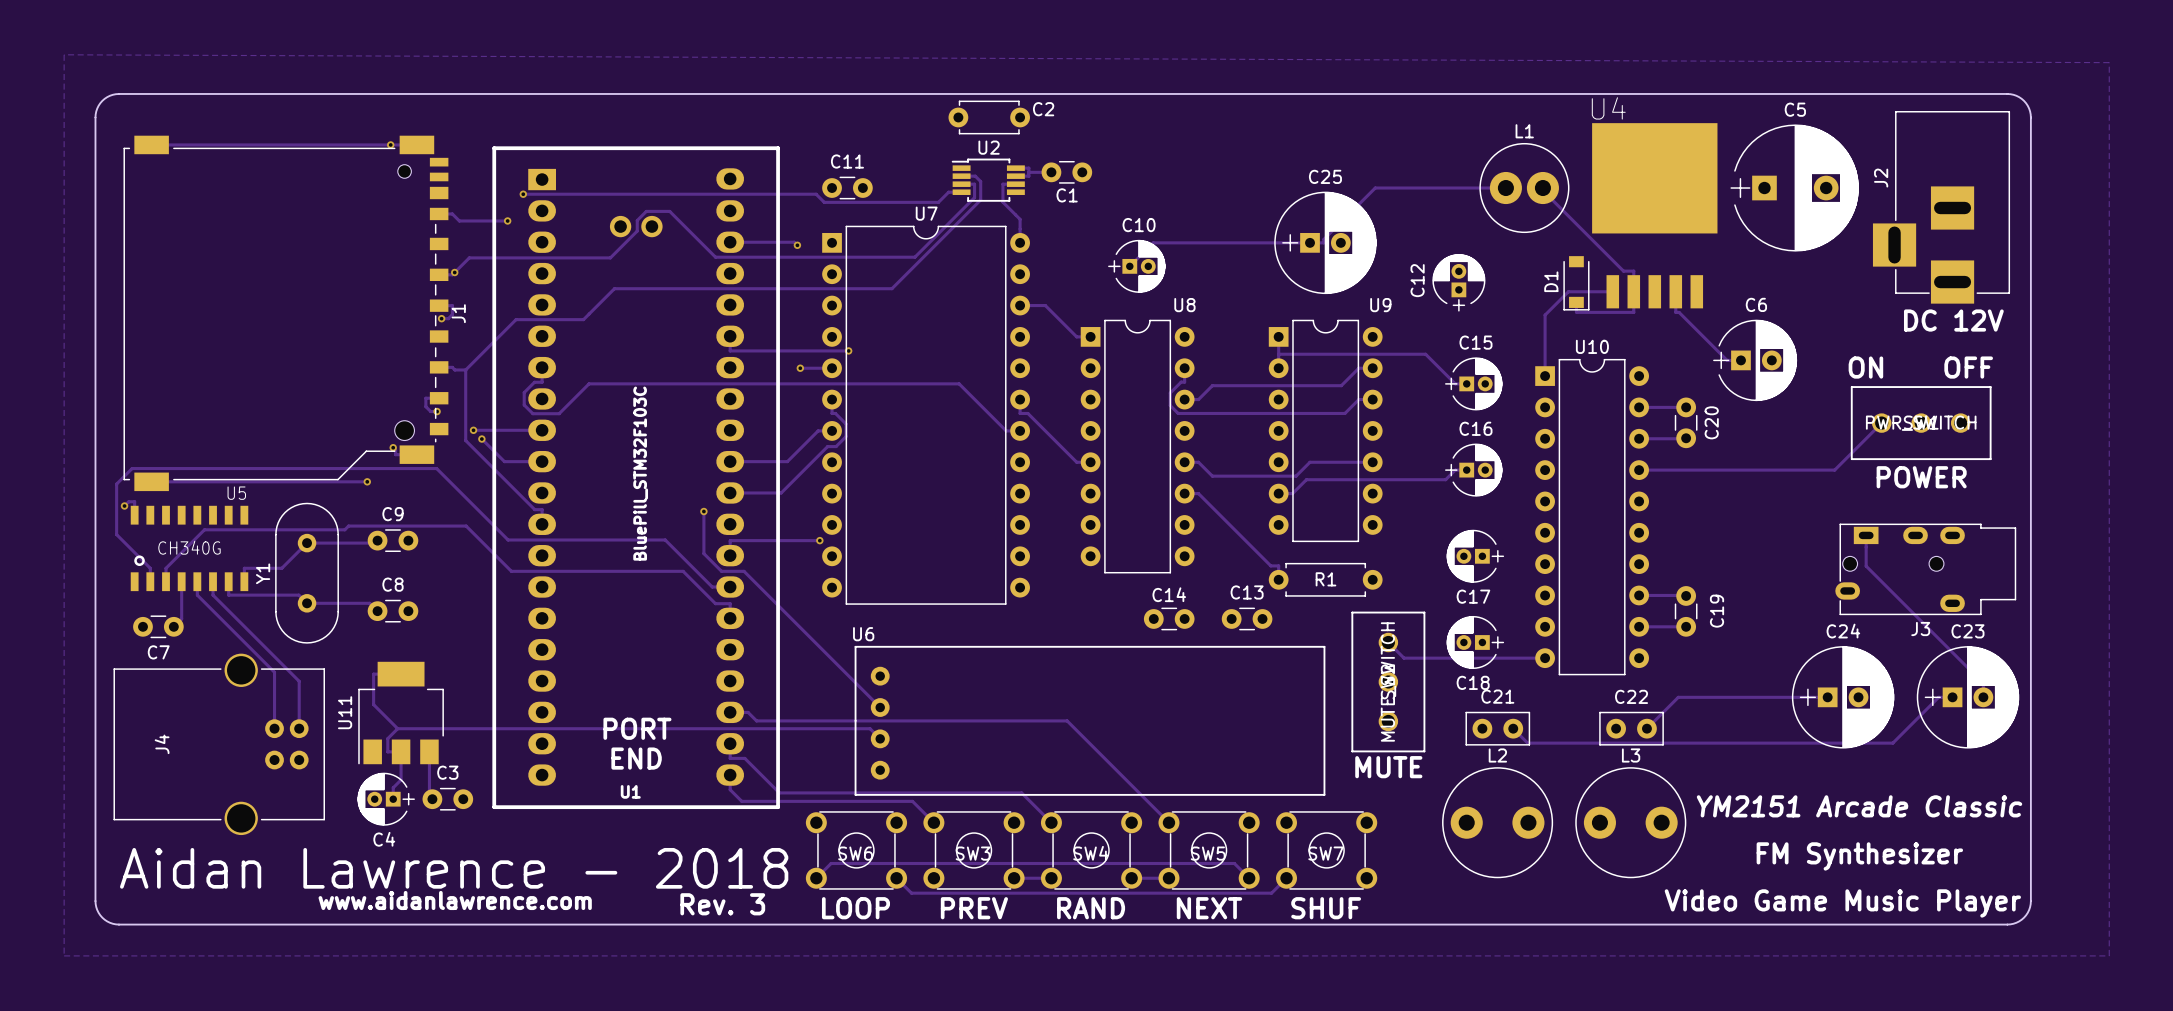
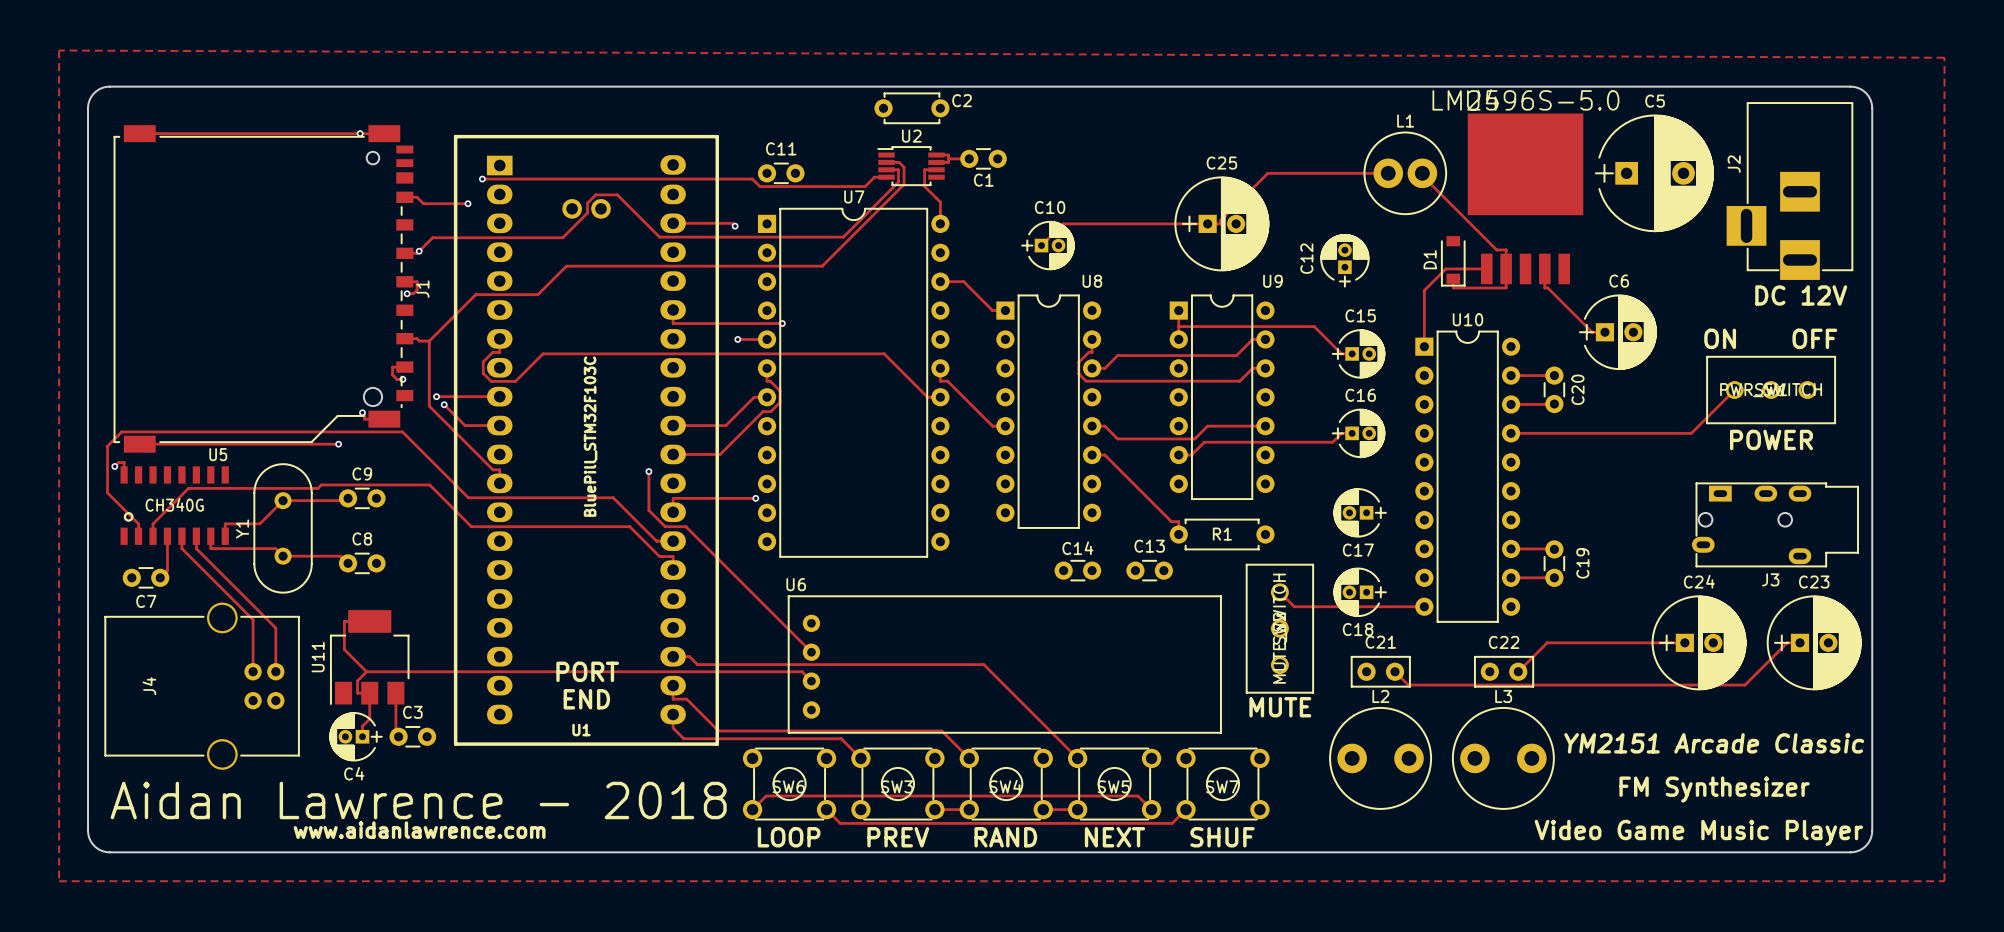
U4 value: none -> LM2596S-5.0 (1525, 100)
track: (1866, 535) (1866, 566) (1983, 683) (1983, 697) -> none
text: Rev. 3 (722, 904) -> none

